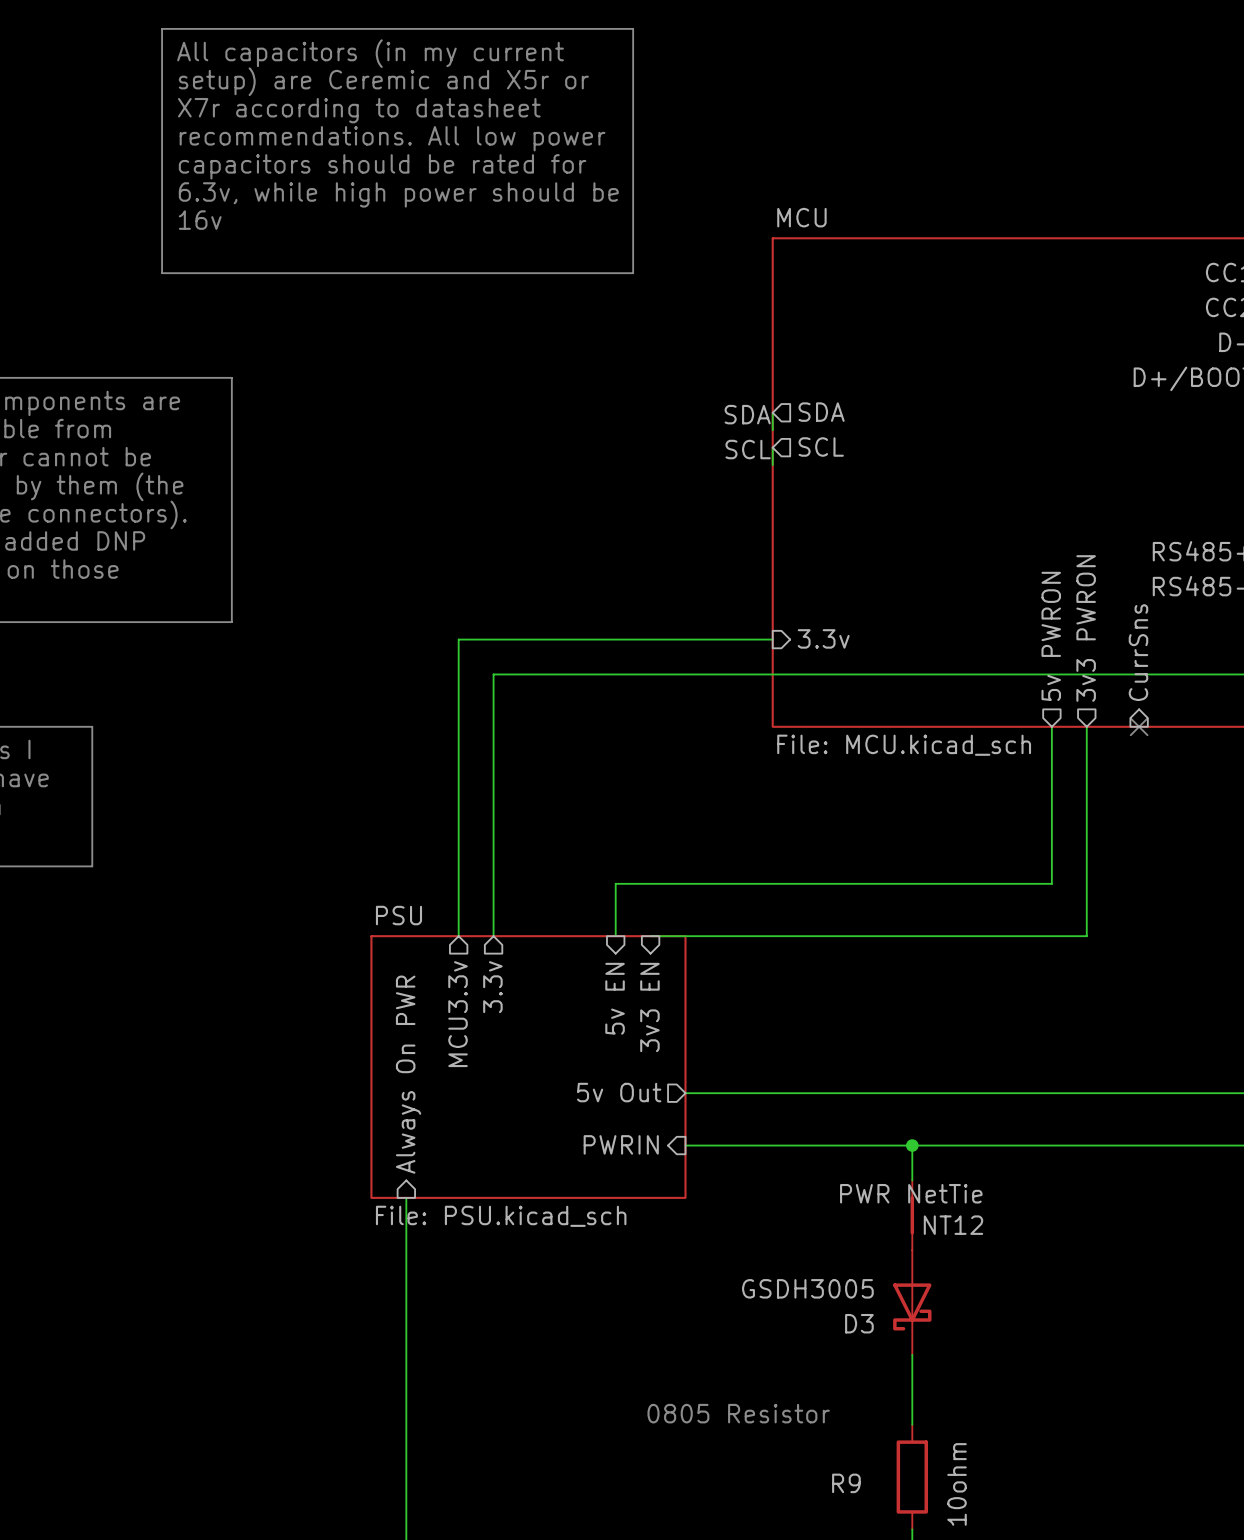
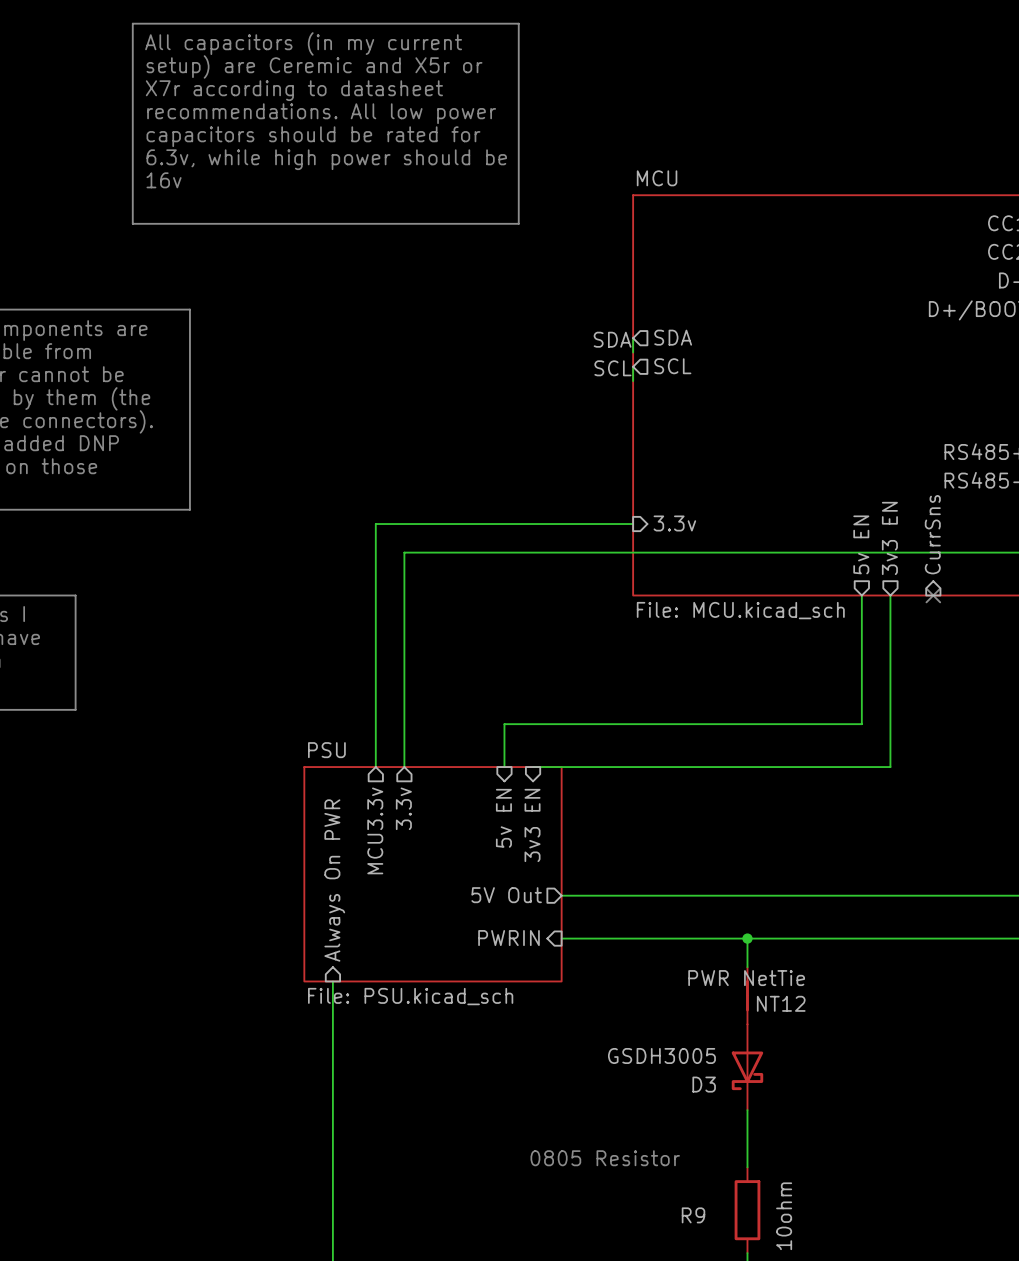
sheet pin: 3v3 PWRON (1086, 628) -> 3v3 EN (889, 538)
sheet pin: 5v PWRON (1051, 636) -> 5v EN (861, 544)
sheet pin: 5v Out (619, 1092) -> 5V Out (506, 895)

